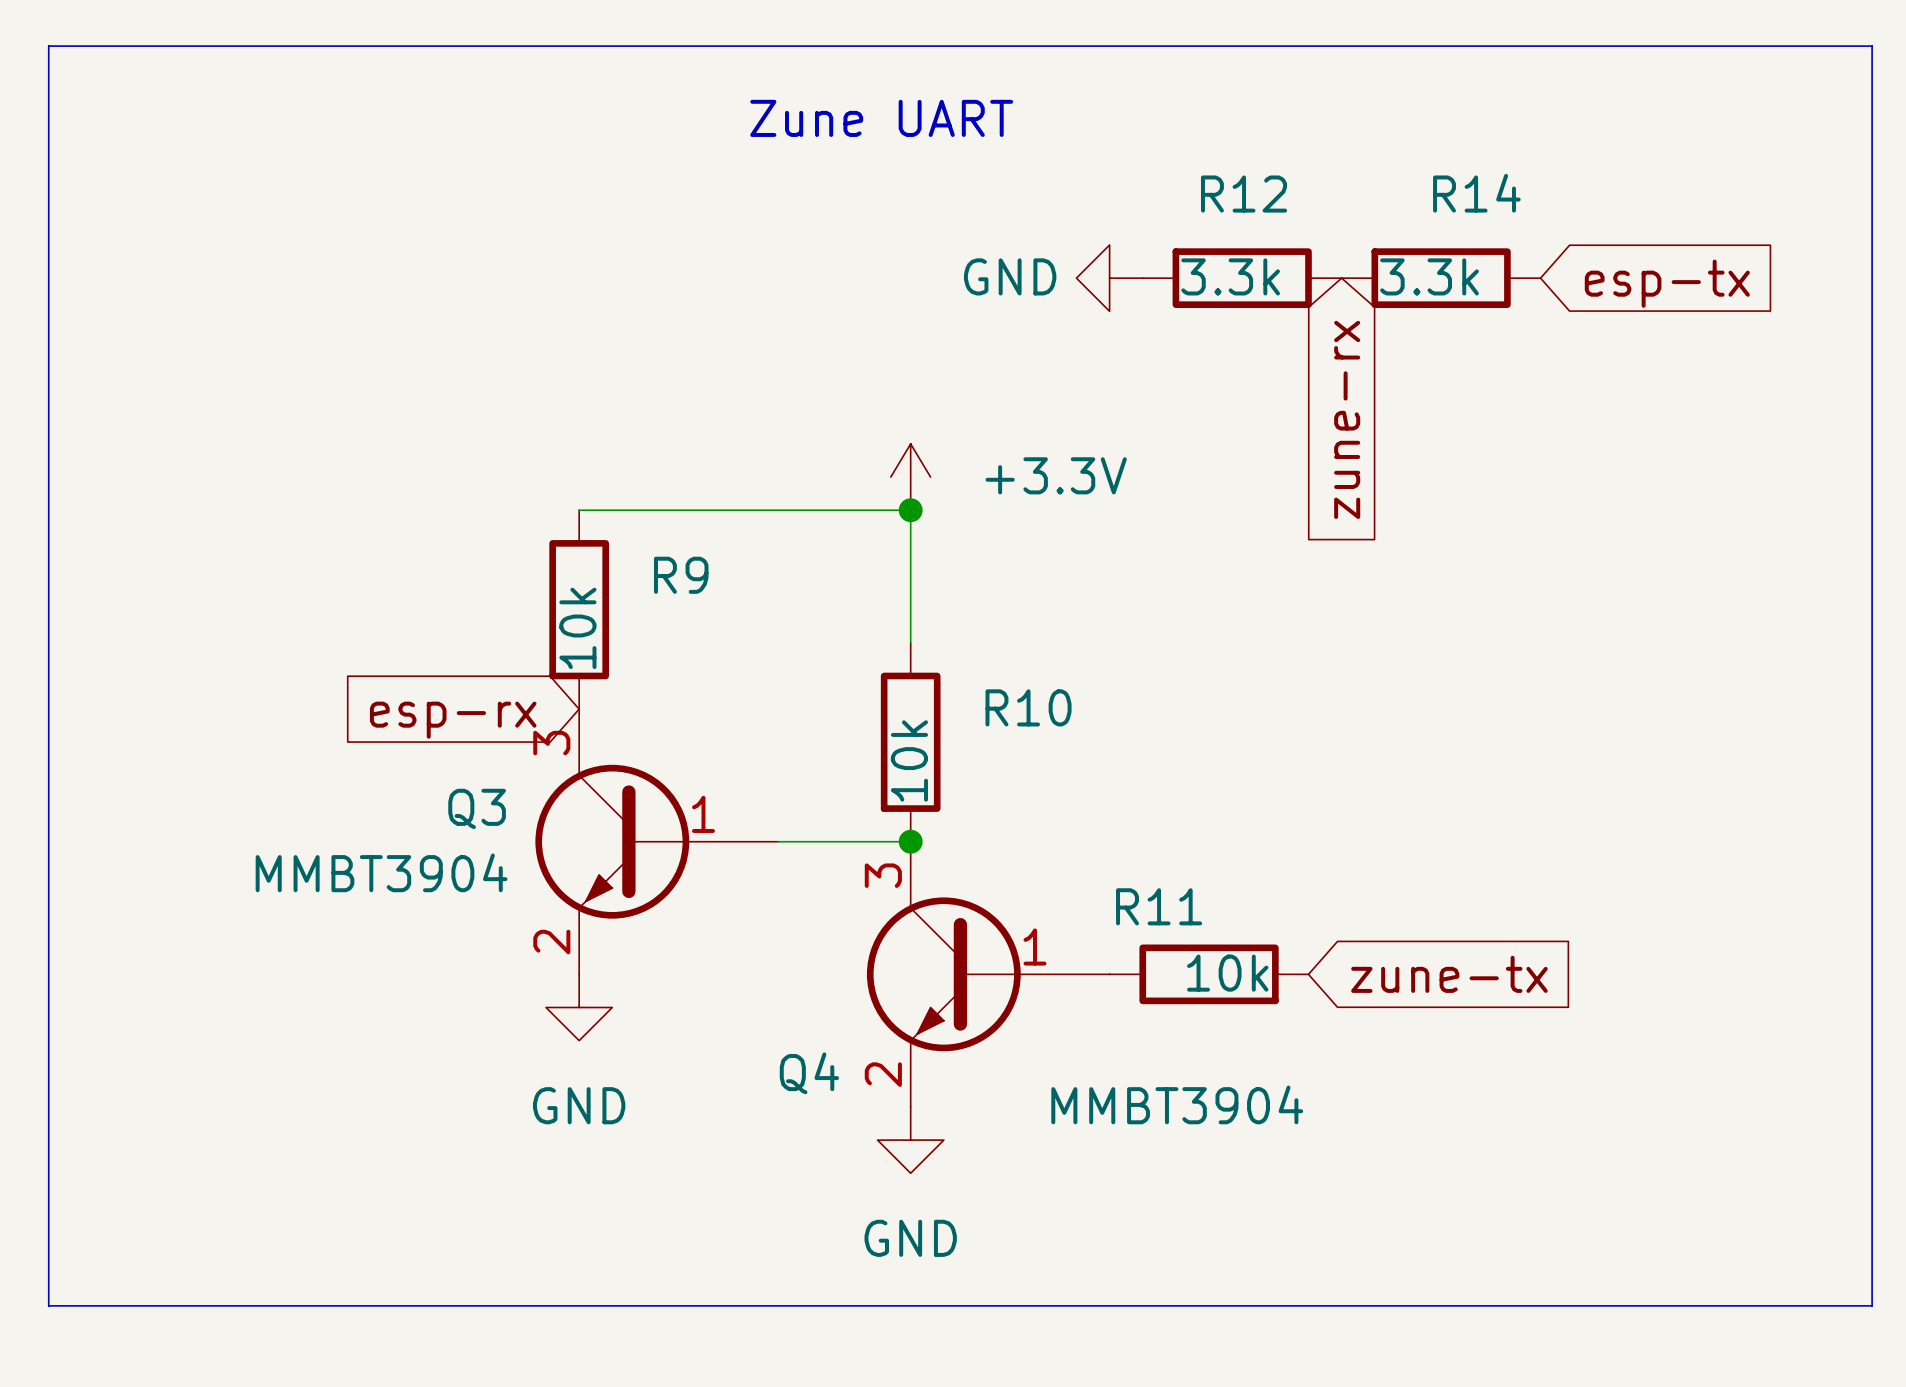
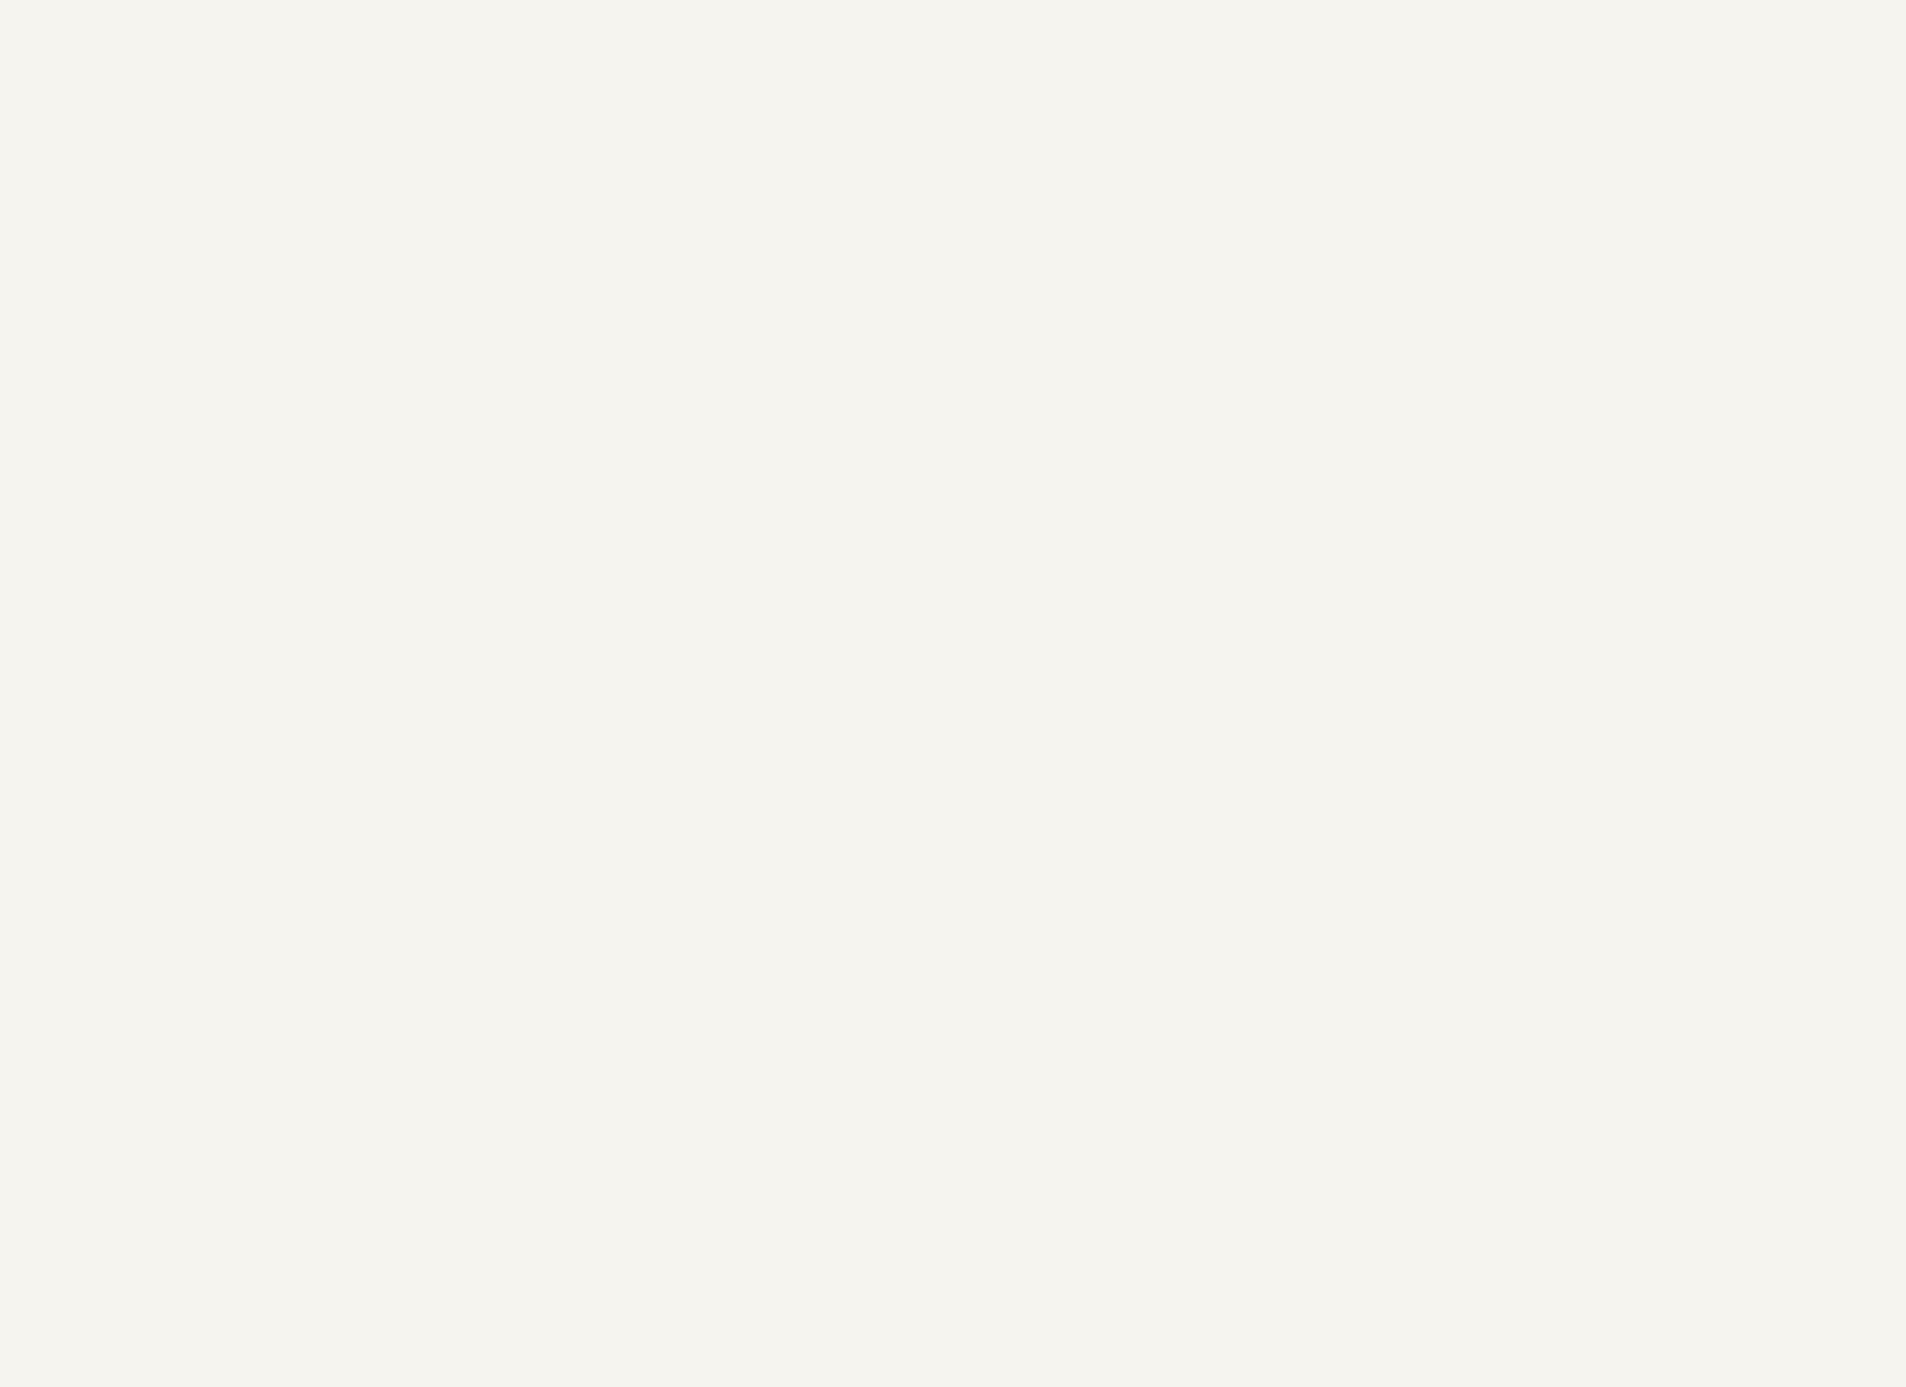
line: (48, 46) (1872, 46) (1872, 1305) (48, 1305) (48, 46) -> none
text: Zune UART (881, 118) -> none
power symbol: GND (1109, 278) -> none
R12: 3.3k (1242, 278) -> none
R14: 3.3k (1441, 278) -> none
global label: esp-tx (1667, 283) -> none
global label: zune-rx (1347, 419) -> none
power symbol: +3.3V (910, 477) -> none
wire: (579, 510) (910, 510) (910, 642) -> none
junction: (910, 510) -> none
R9: 10k (579, 609) -> none
global label: esp-rx (453, 720) -> none
R10: 10k (910, 742) -> none
Q3: MMBT3904 (656, 841) -> none
wire: (778, 841) (910, 841) -> none
junction: (910, 841) -> none
Q4: MMBT3904 (988, 974) -> none
R11: 10k (1209, 974) -> none
global label: zune-tx (1449, 974) -> none
power symbol: GND (579, 1007) -> none
power symbol: GND (910, 1140) -> none

